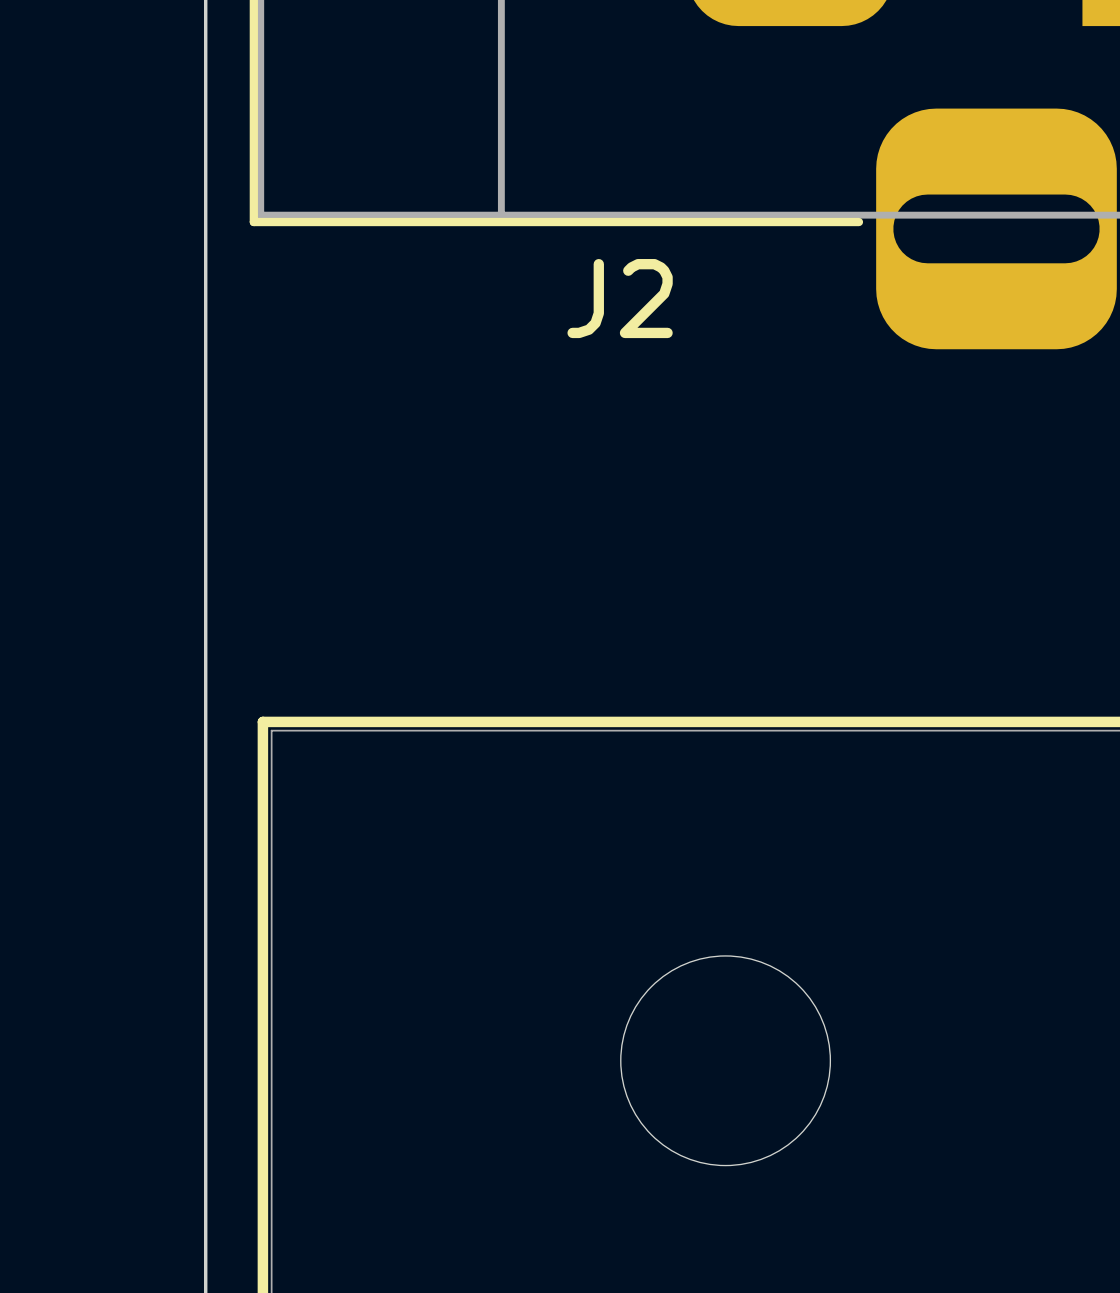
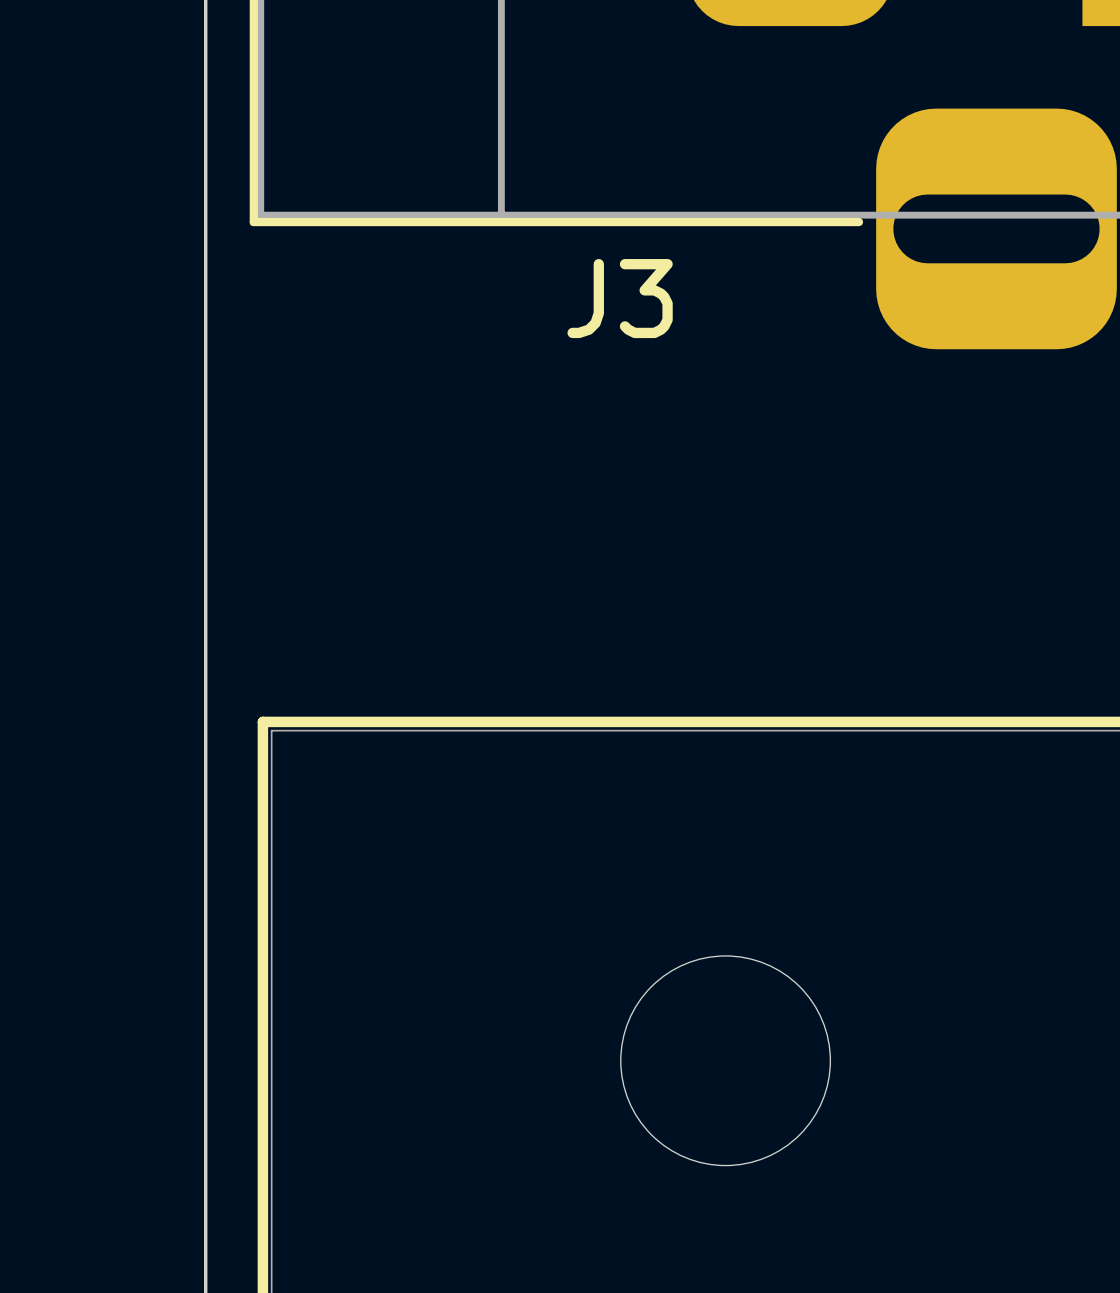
J2 name: J2 (620, 298) -> J3 (620, 298)

